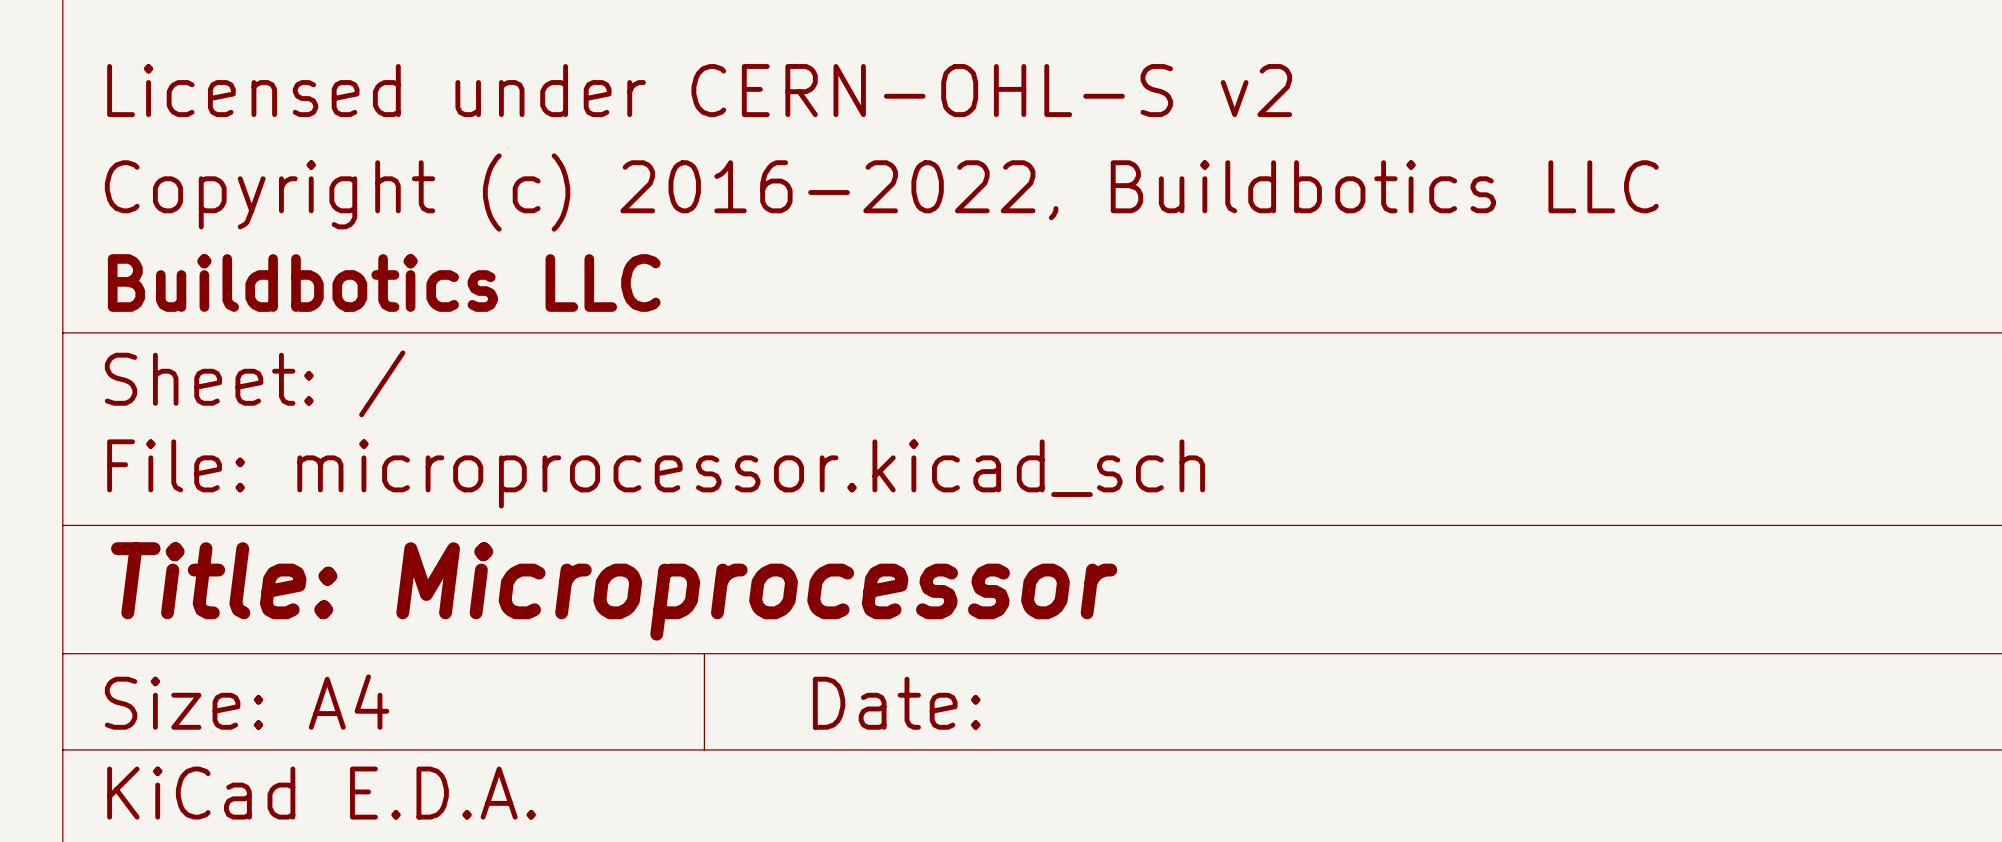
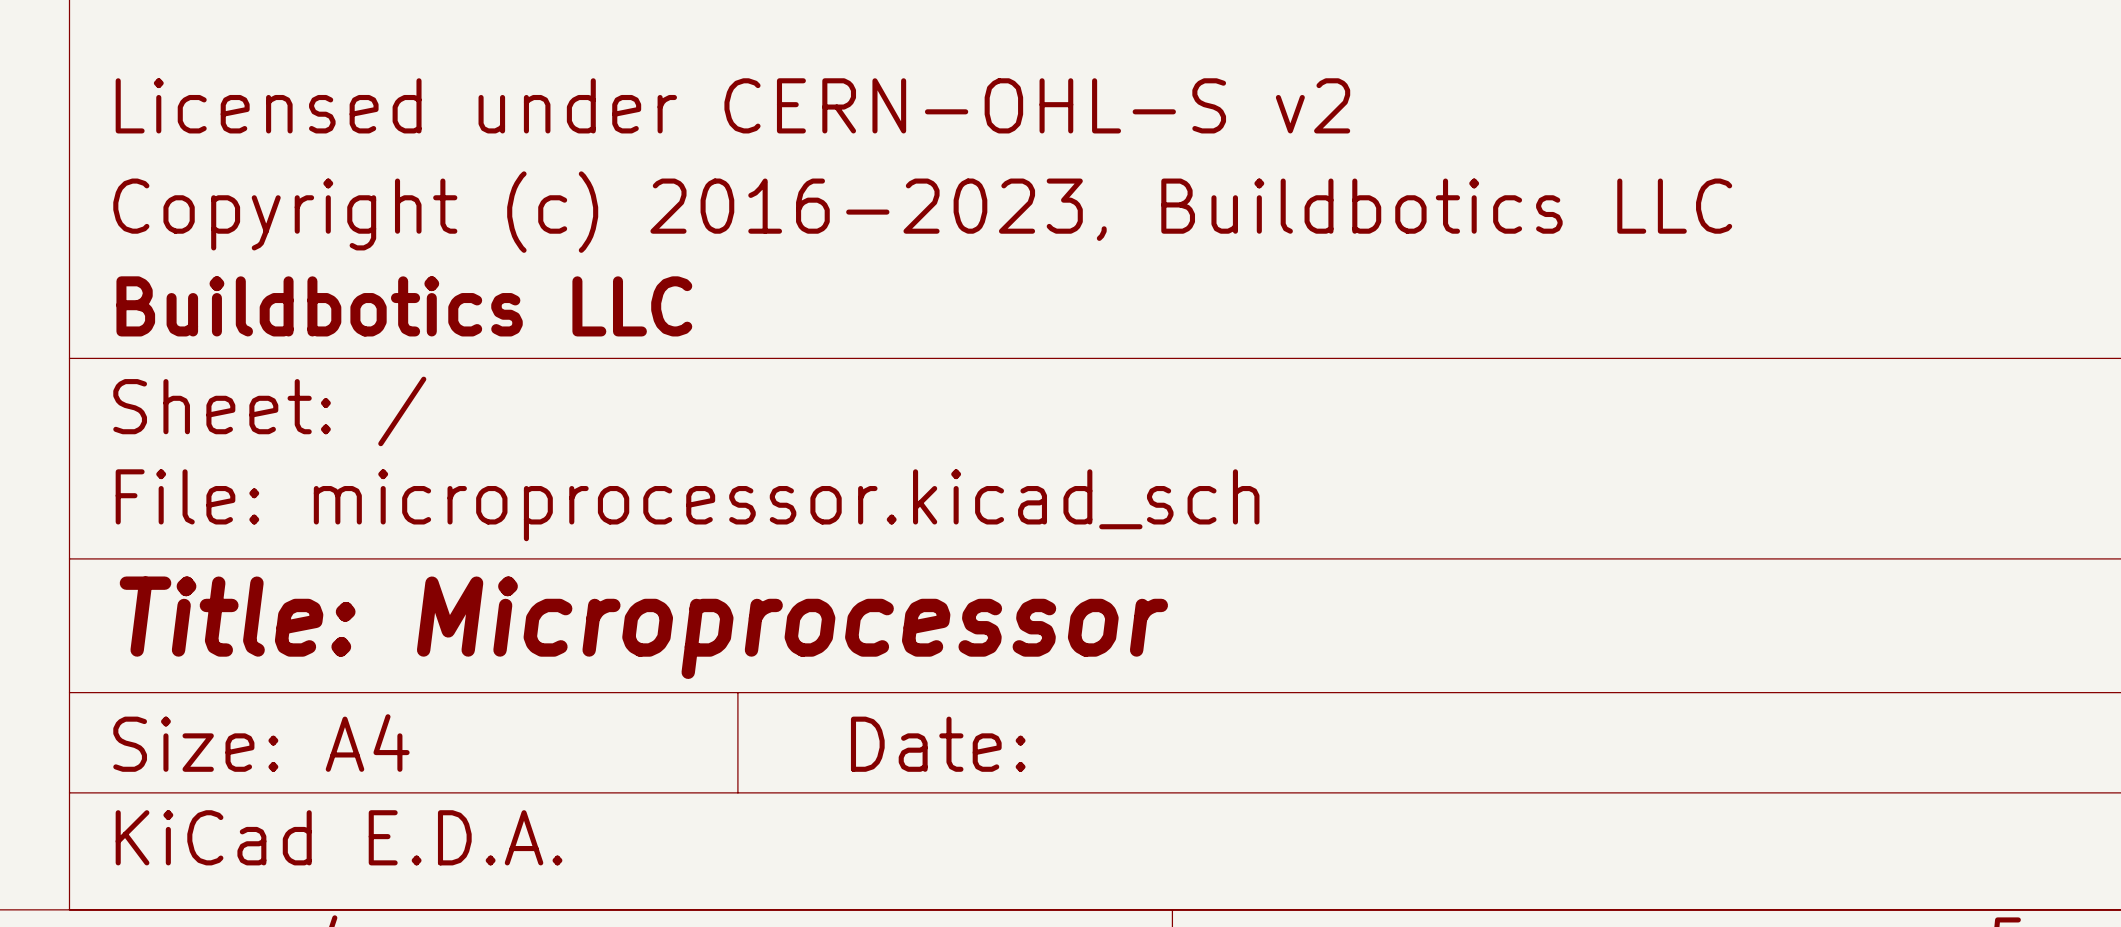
title block: Copyright (c) 2016-2022, Buildbotics LLC (881, 192) -> Copyright (c) 2016-2023, Buildbotics LLC (922, 212)

